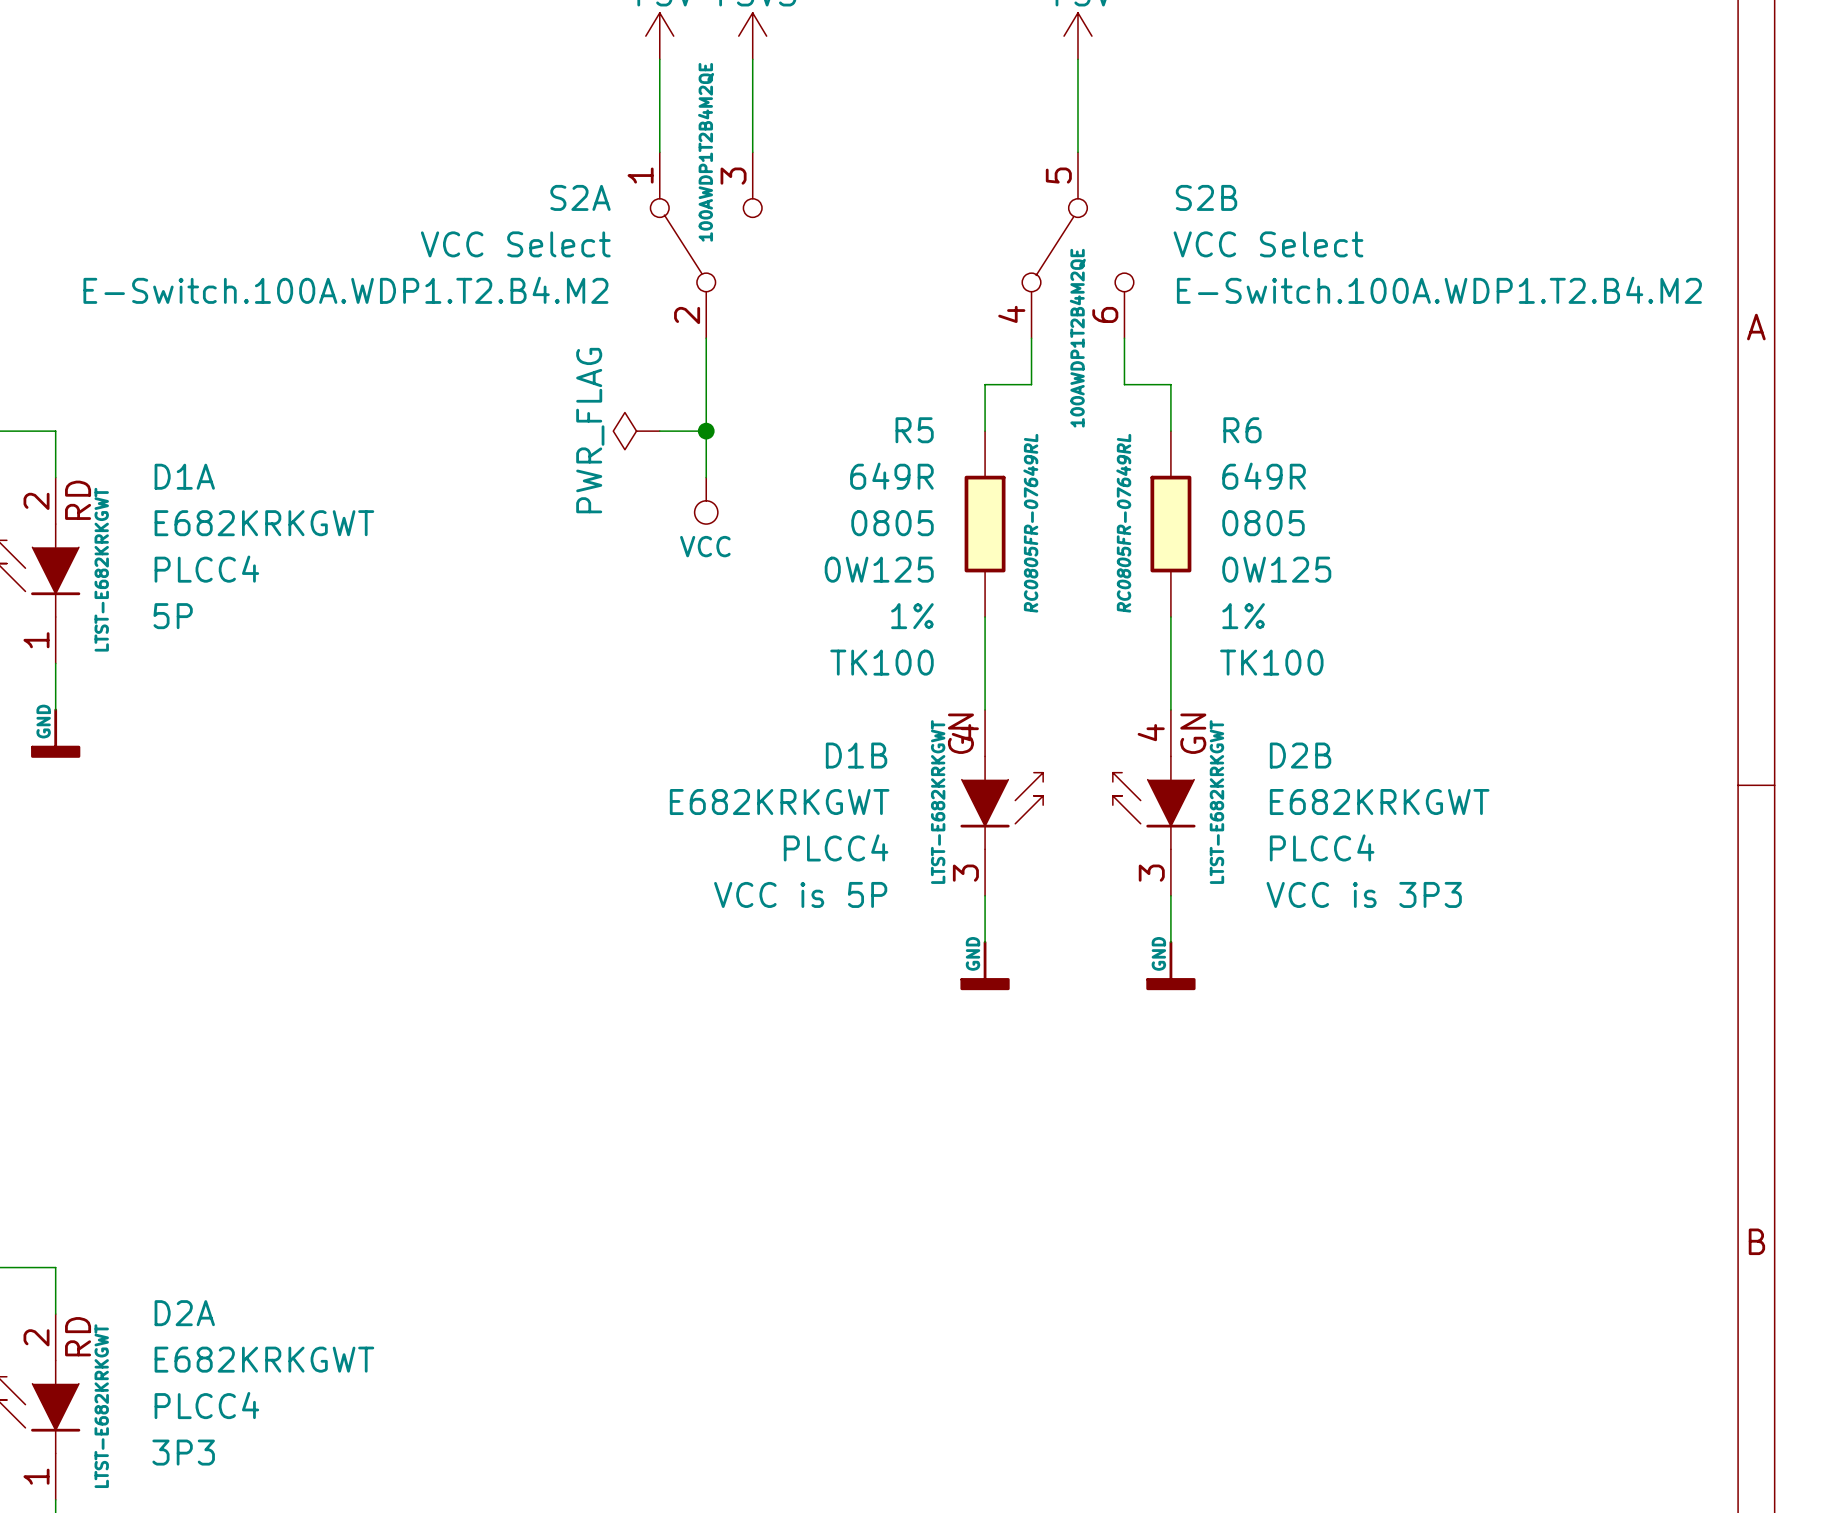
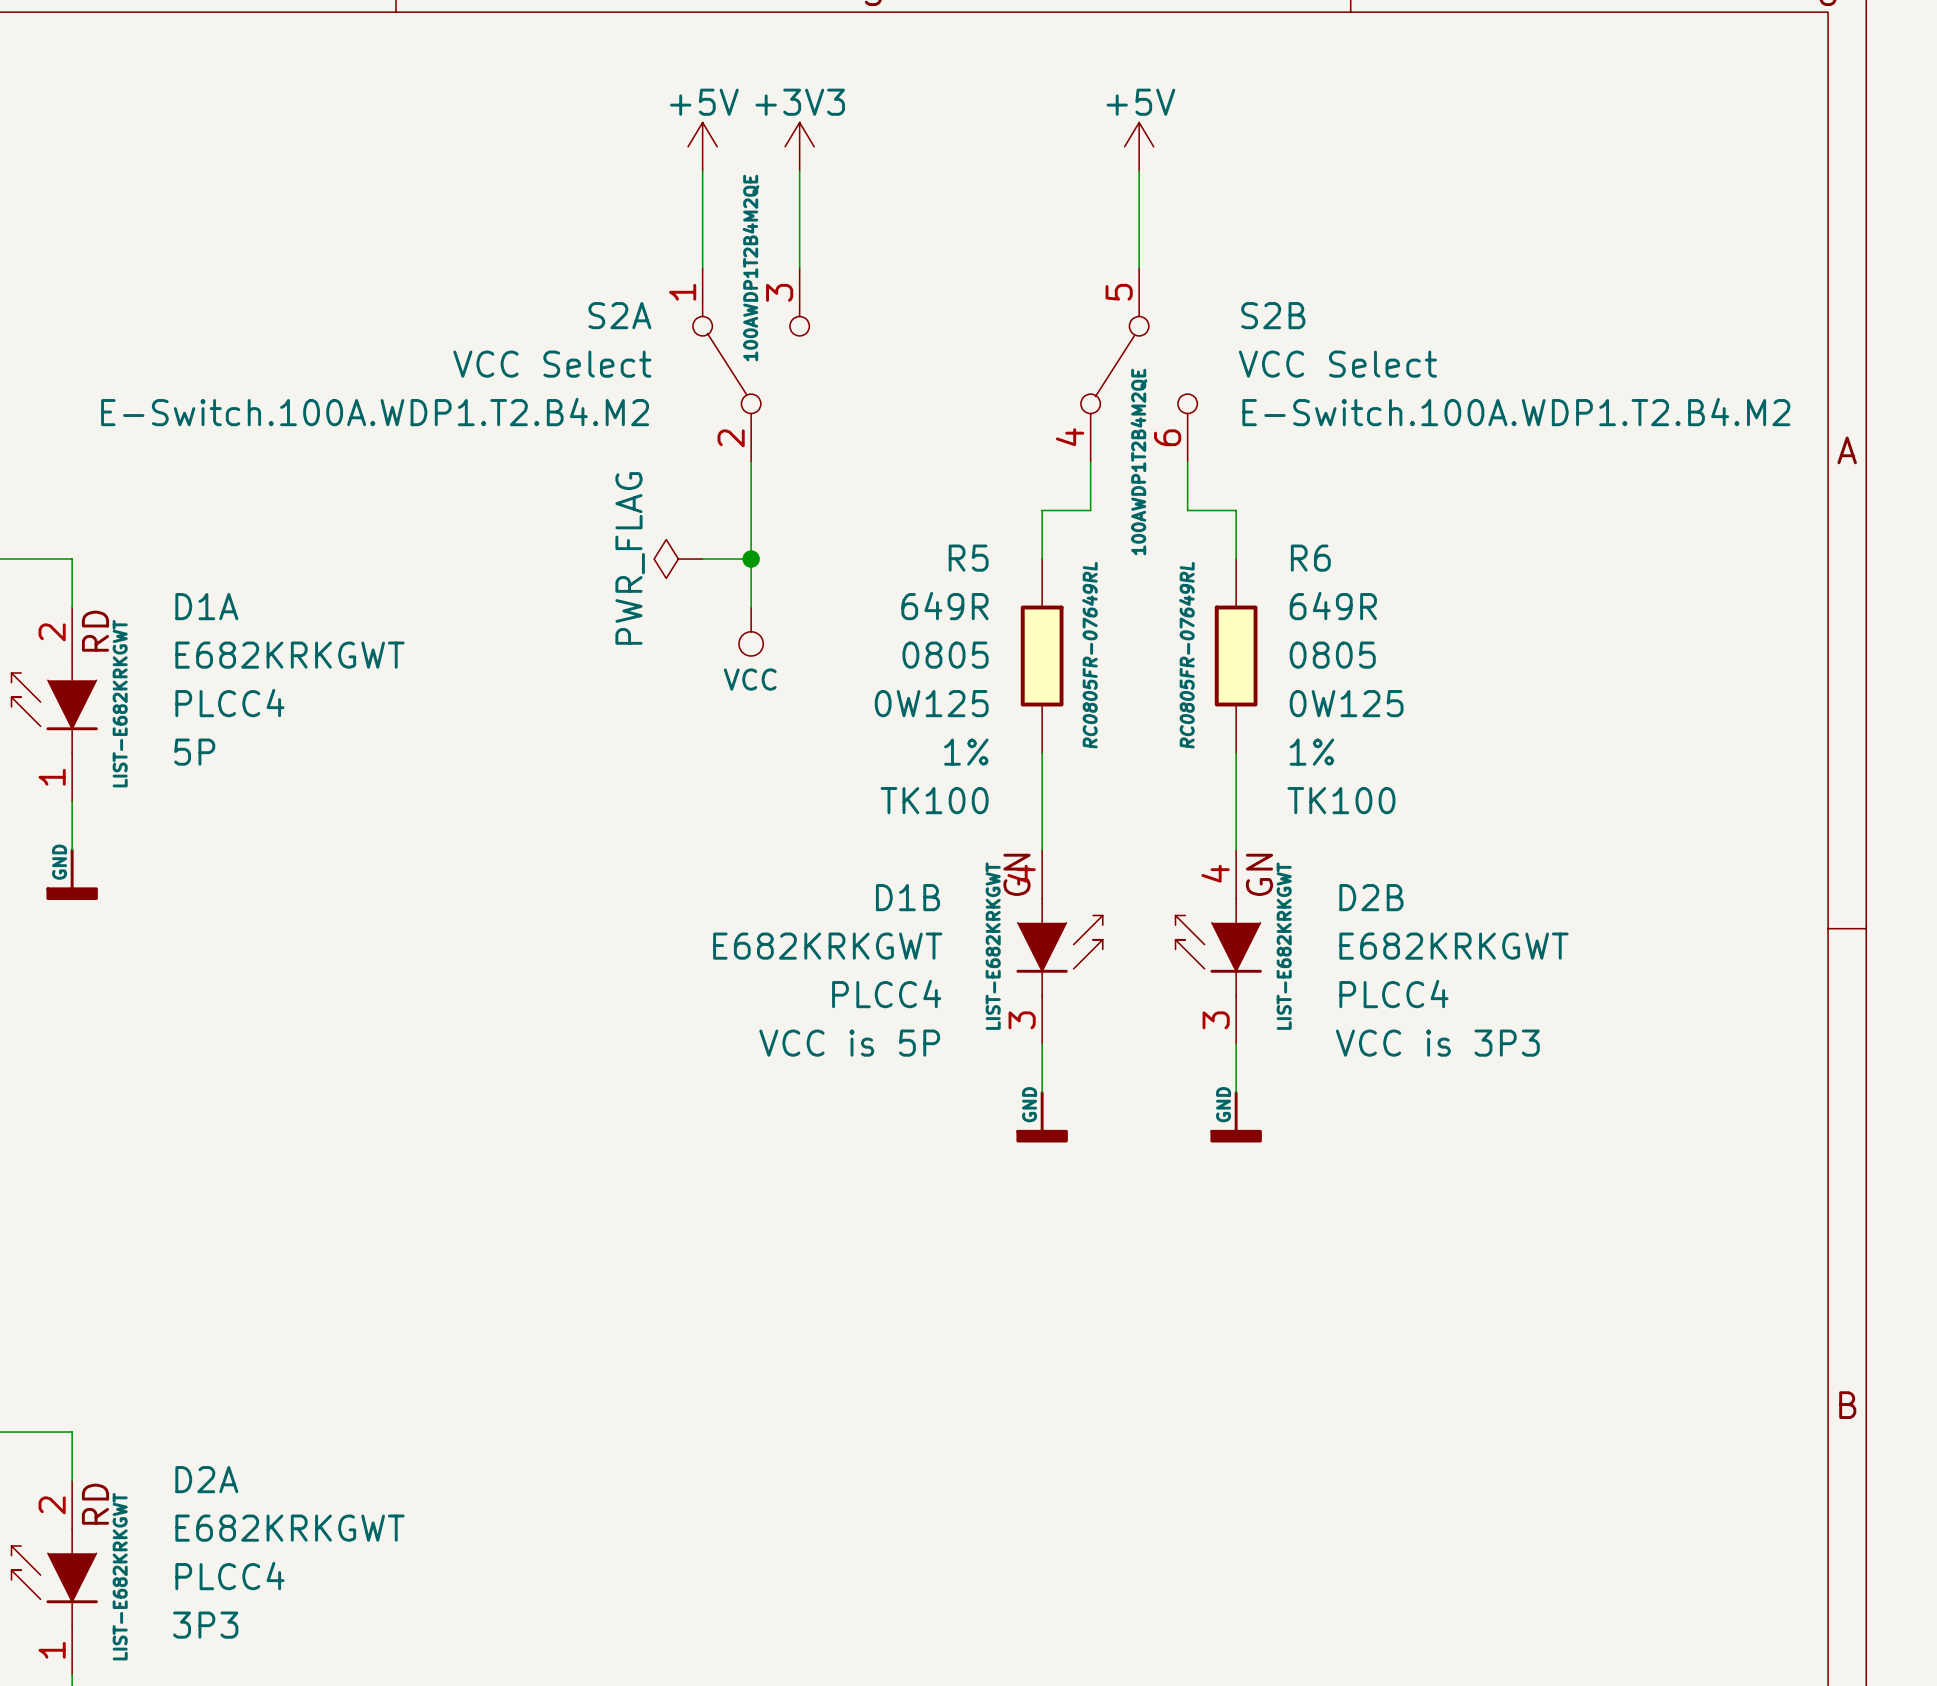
D1A text: LTST-E682KRKGWT (101, 569) -> LIST-E682KRKGWT (120, 703)
D1B text: LTST-E682KRKGWT (938, 802) -> LIST-E682KRKGWT (993, 946)
D2B text: LTST-E682KRKGWT (1216, 802) -> LIST-E682KRKGWT (1284, 946)
D2A text: LTST-E682KRKGWT (101, 1406) -> LIST-E682KRKGWT (120, 1576)

